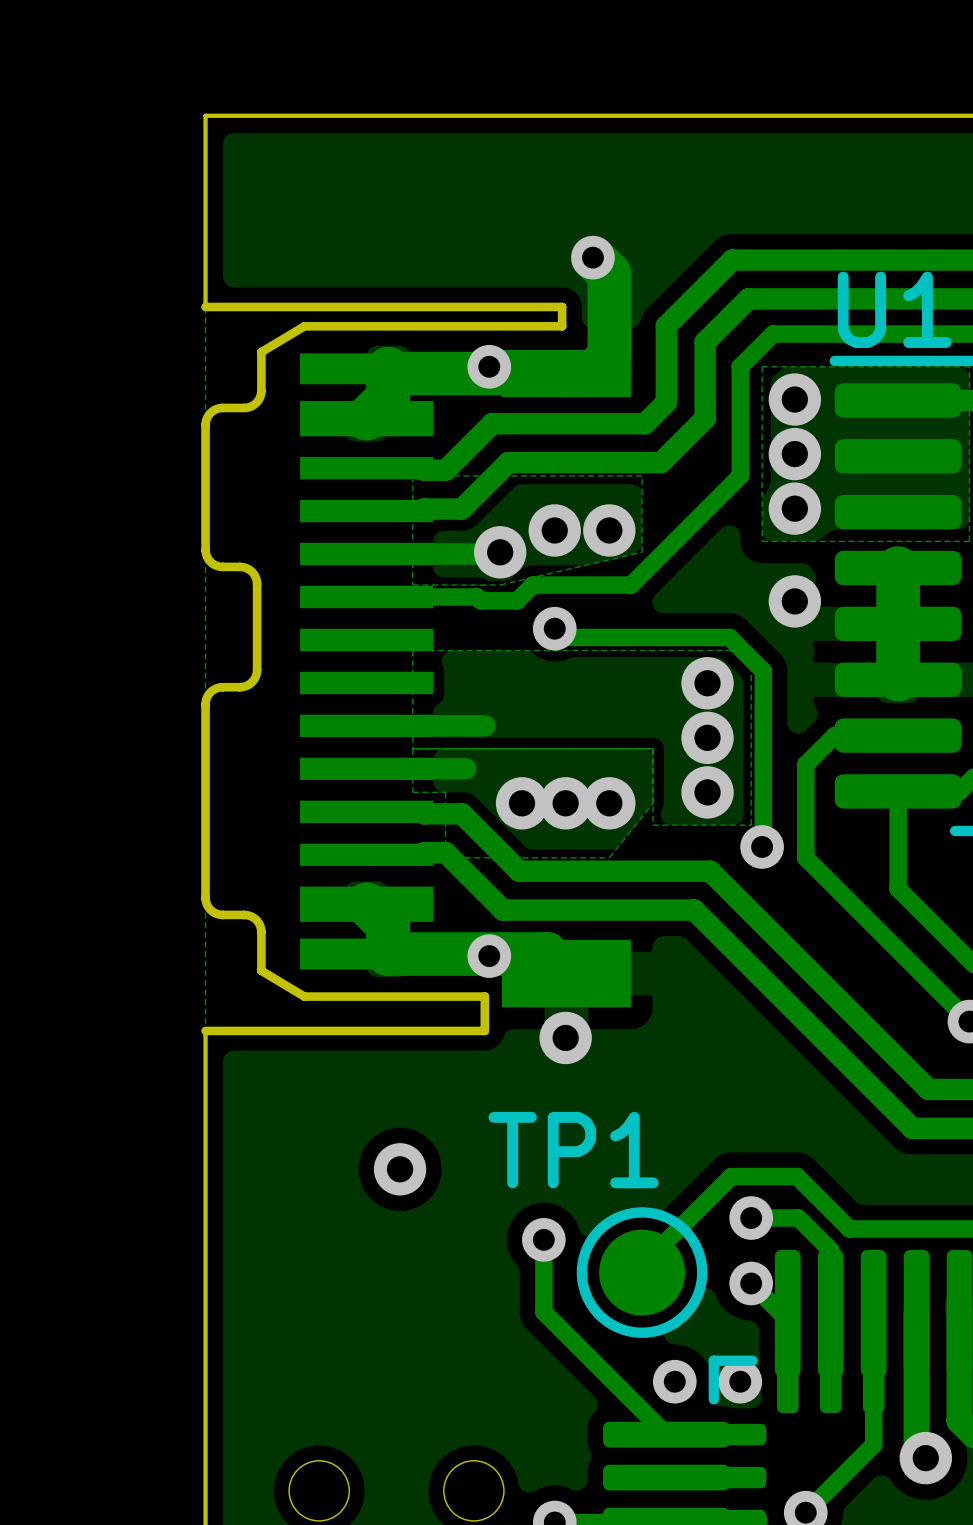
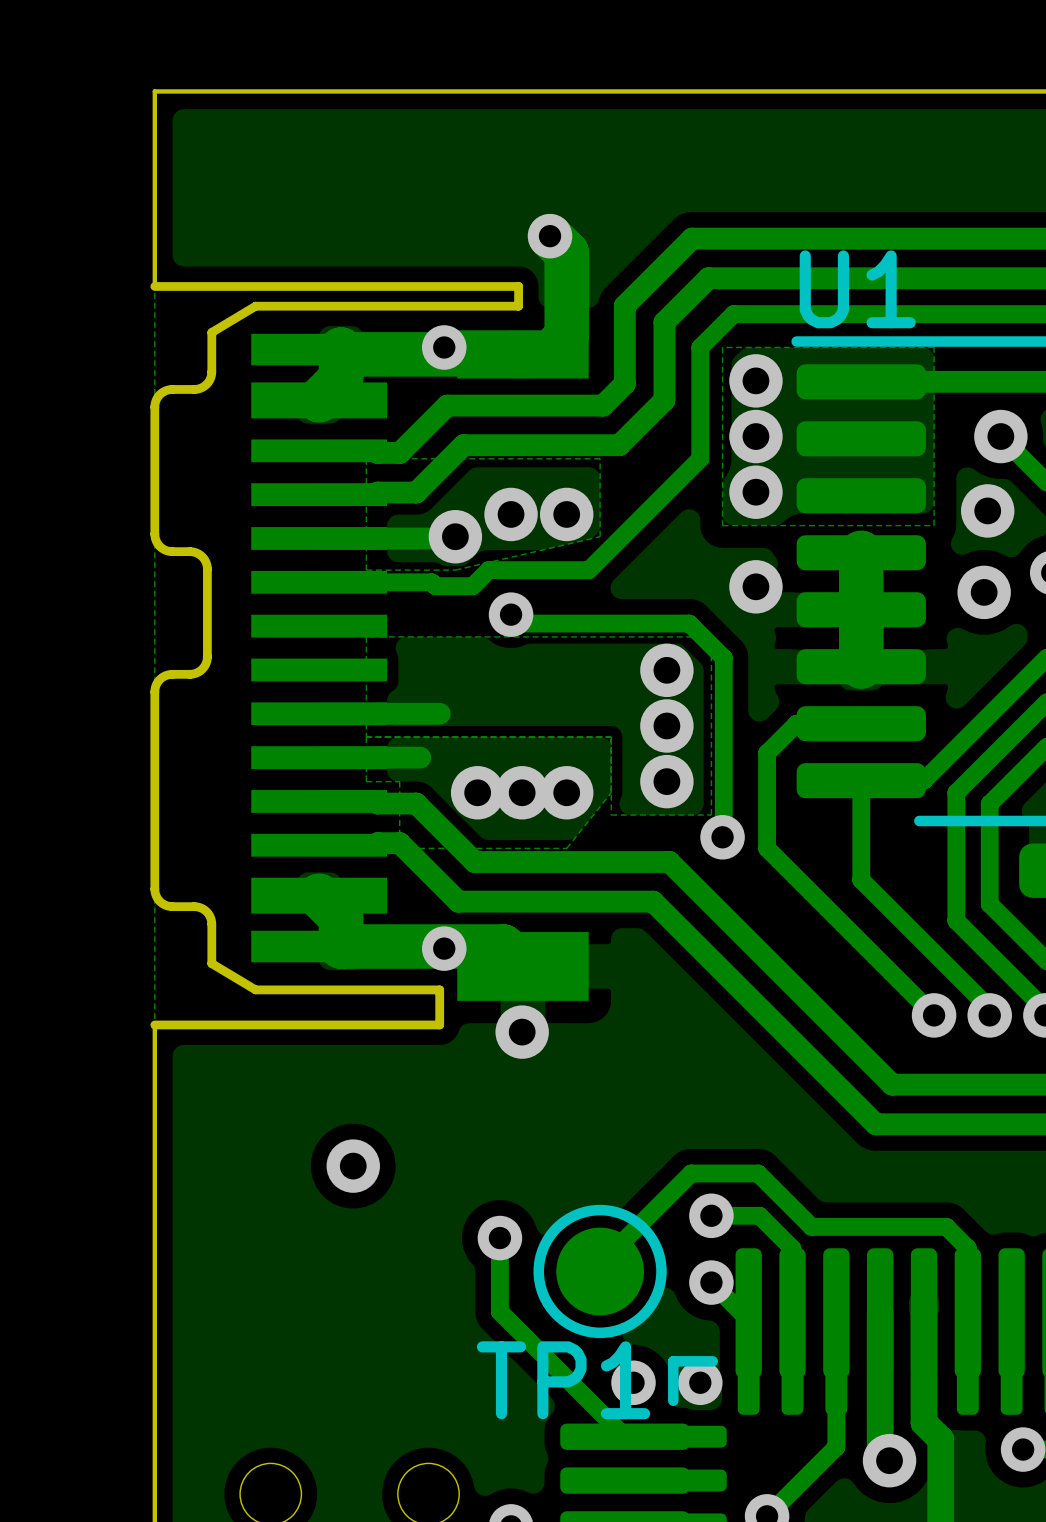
TP1 name position: TP1 (573, 1150) -> TP1 (563, 1380)

